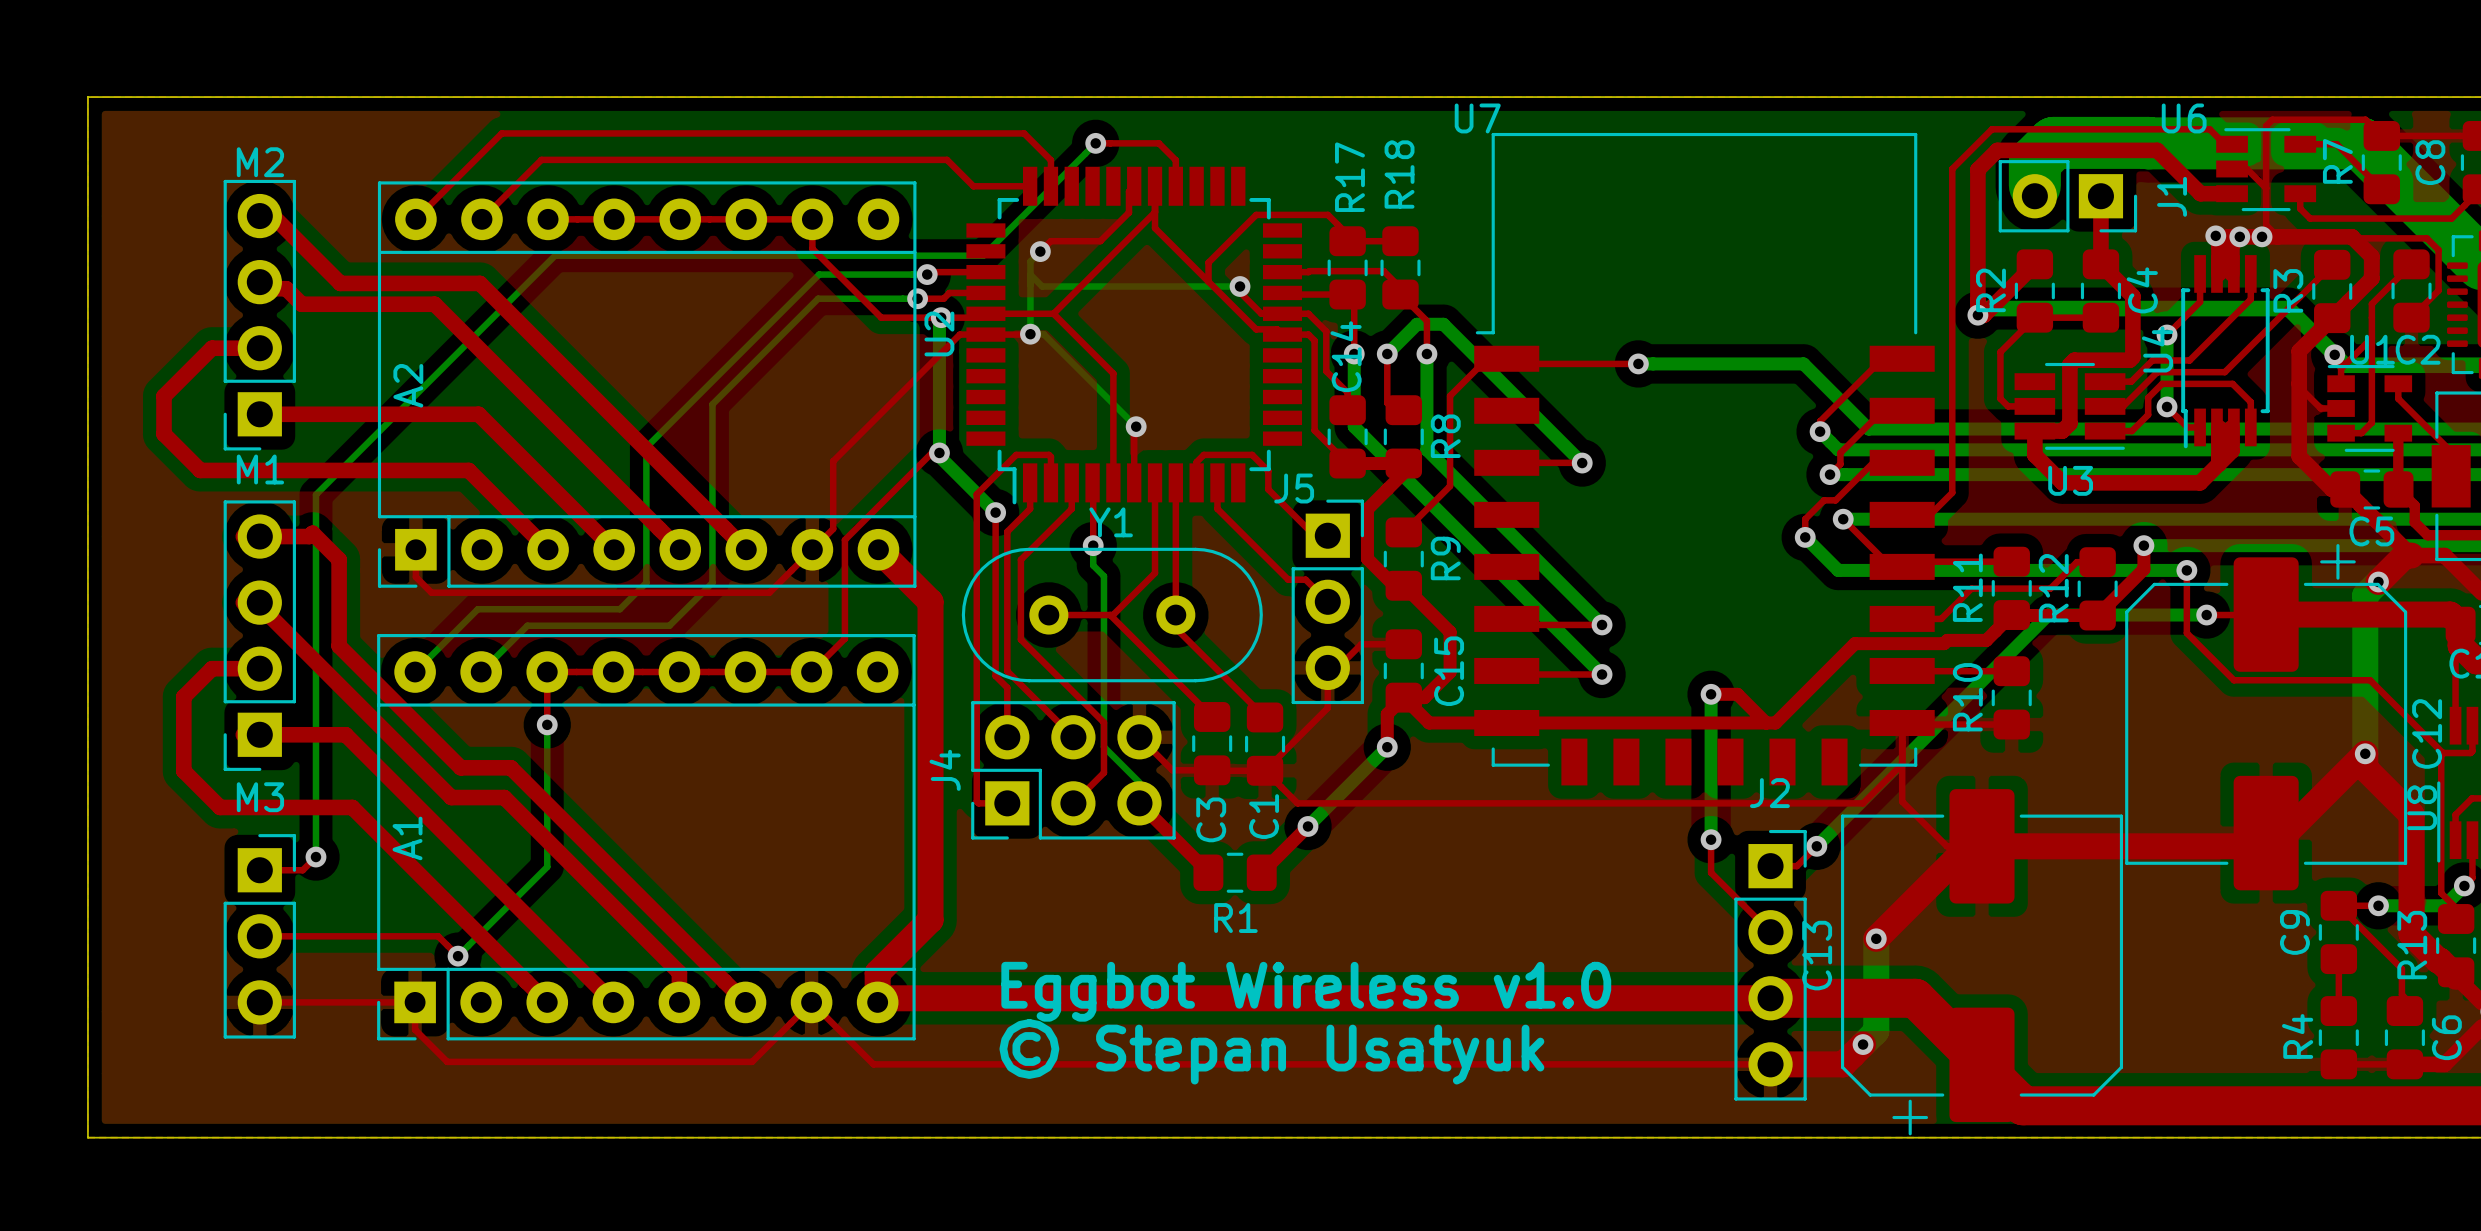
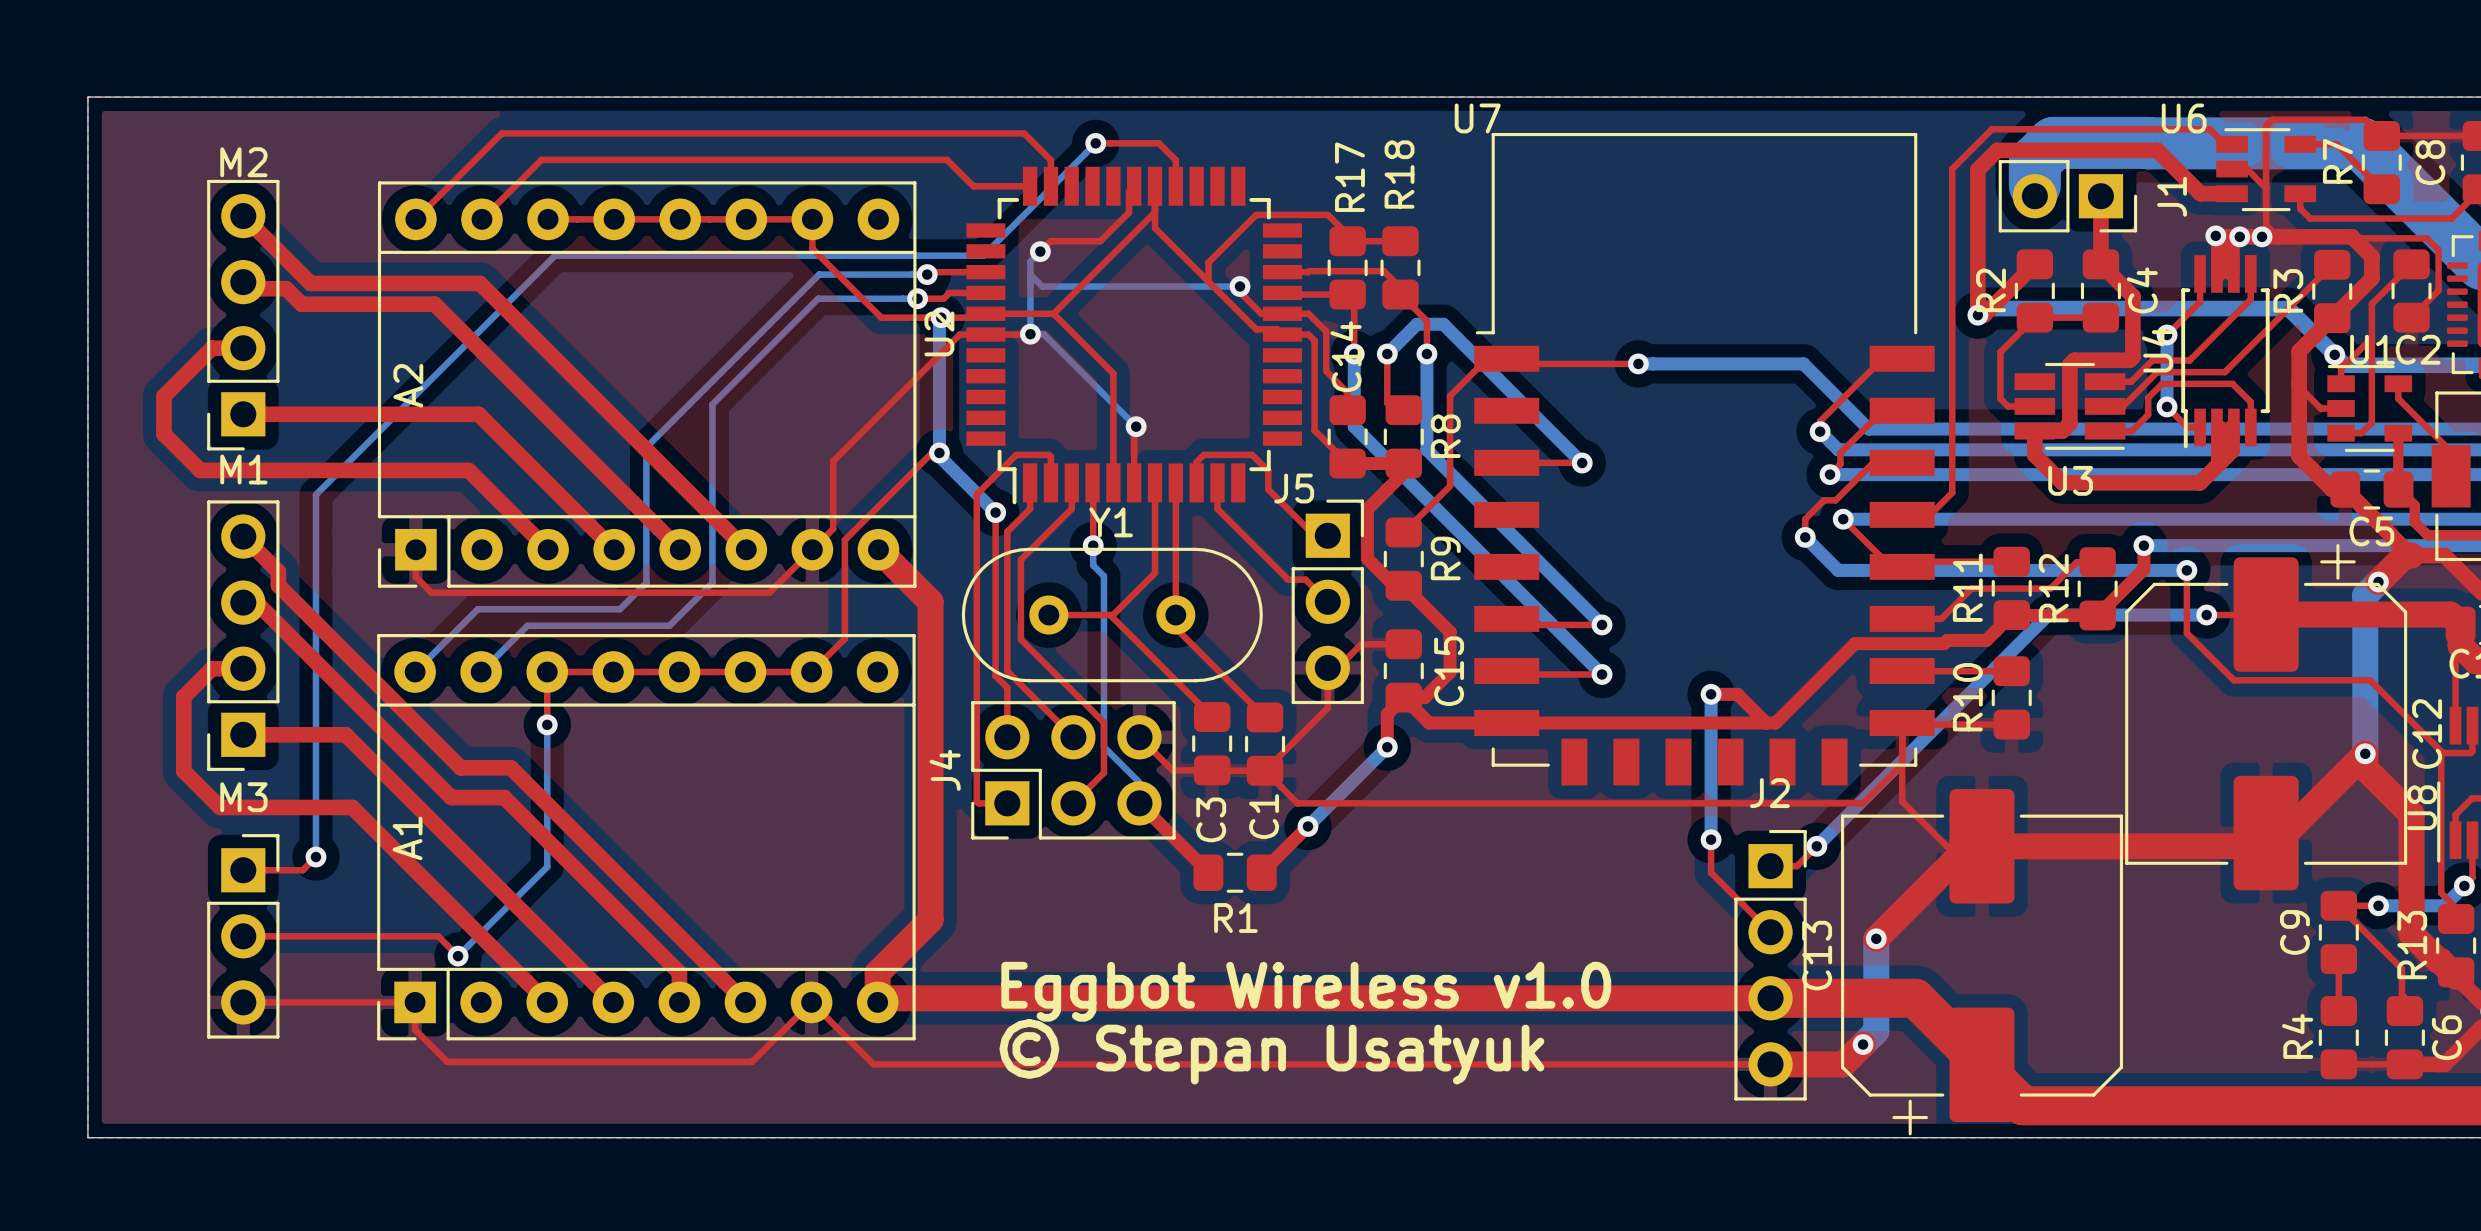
top track: (273, 216) (340, 283) -> (243, 216) (310, 283) (340, 283)
M2 position: (259, 315) -> (243, 315)
top track: (243, 536) (309, 536) (312, 533) (339, 559) (339, 646) -> (243, 536) (278, 571) (278, 585) (339, 646)
M1 position: (259, 635) -> (243, 635)
M3 position: (259, 936) -> (243, 936)

